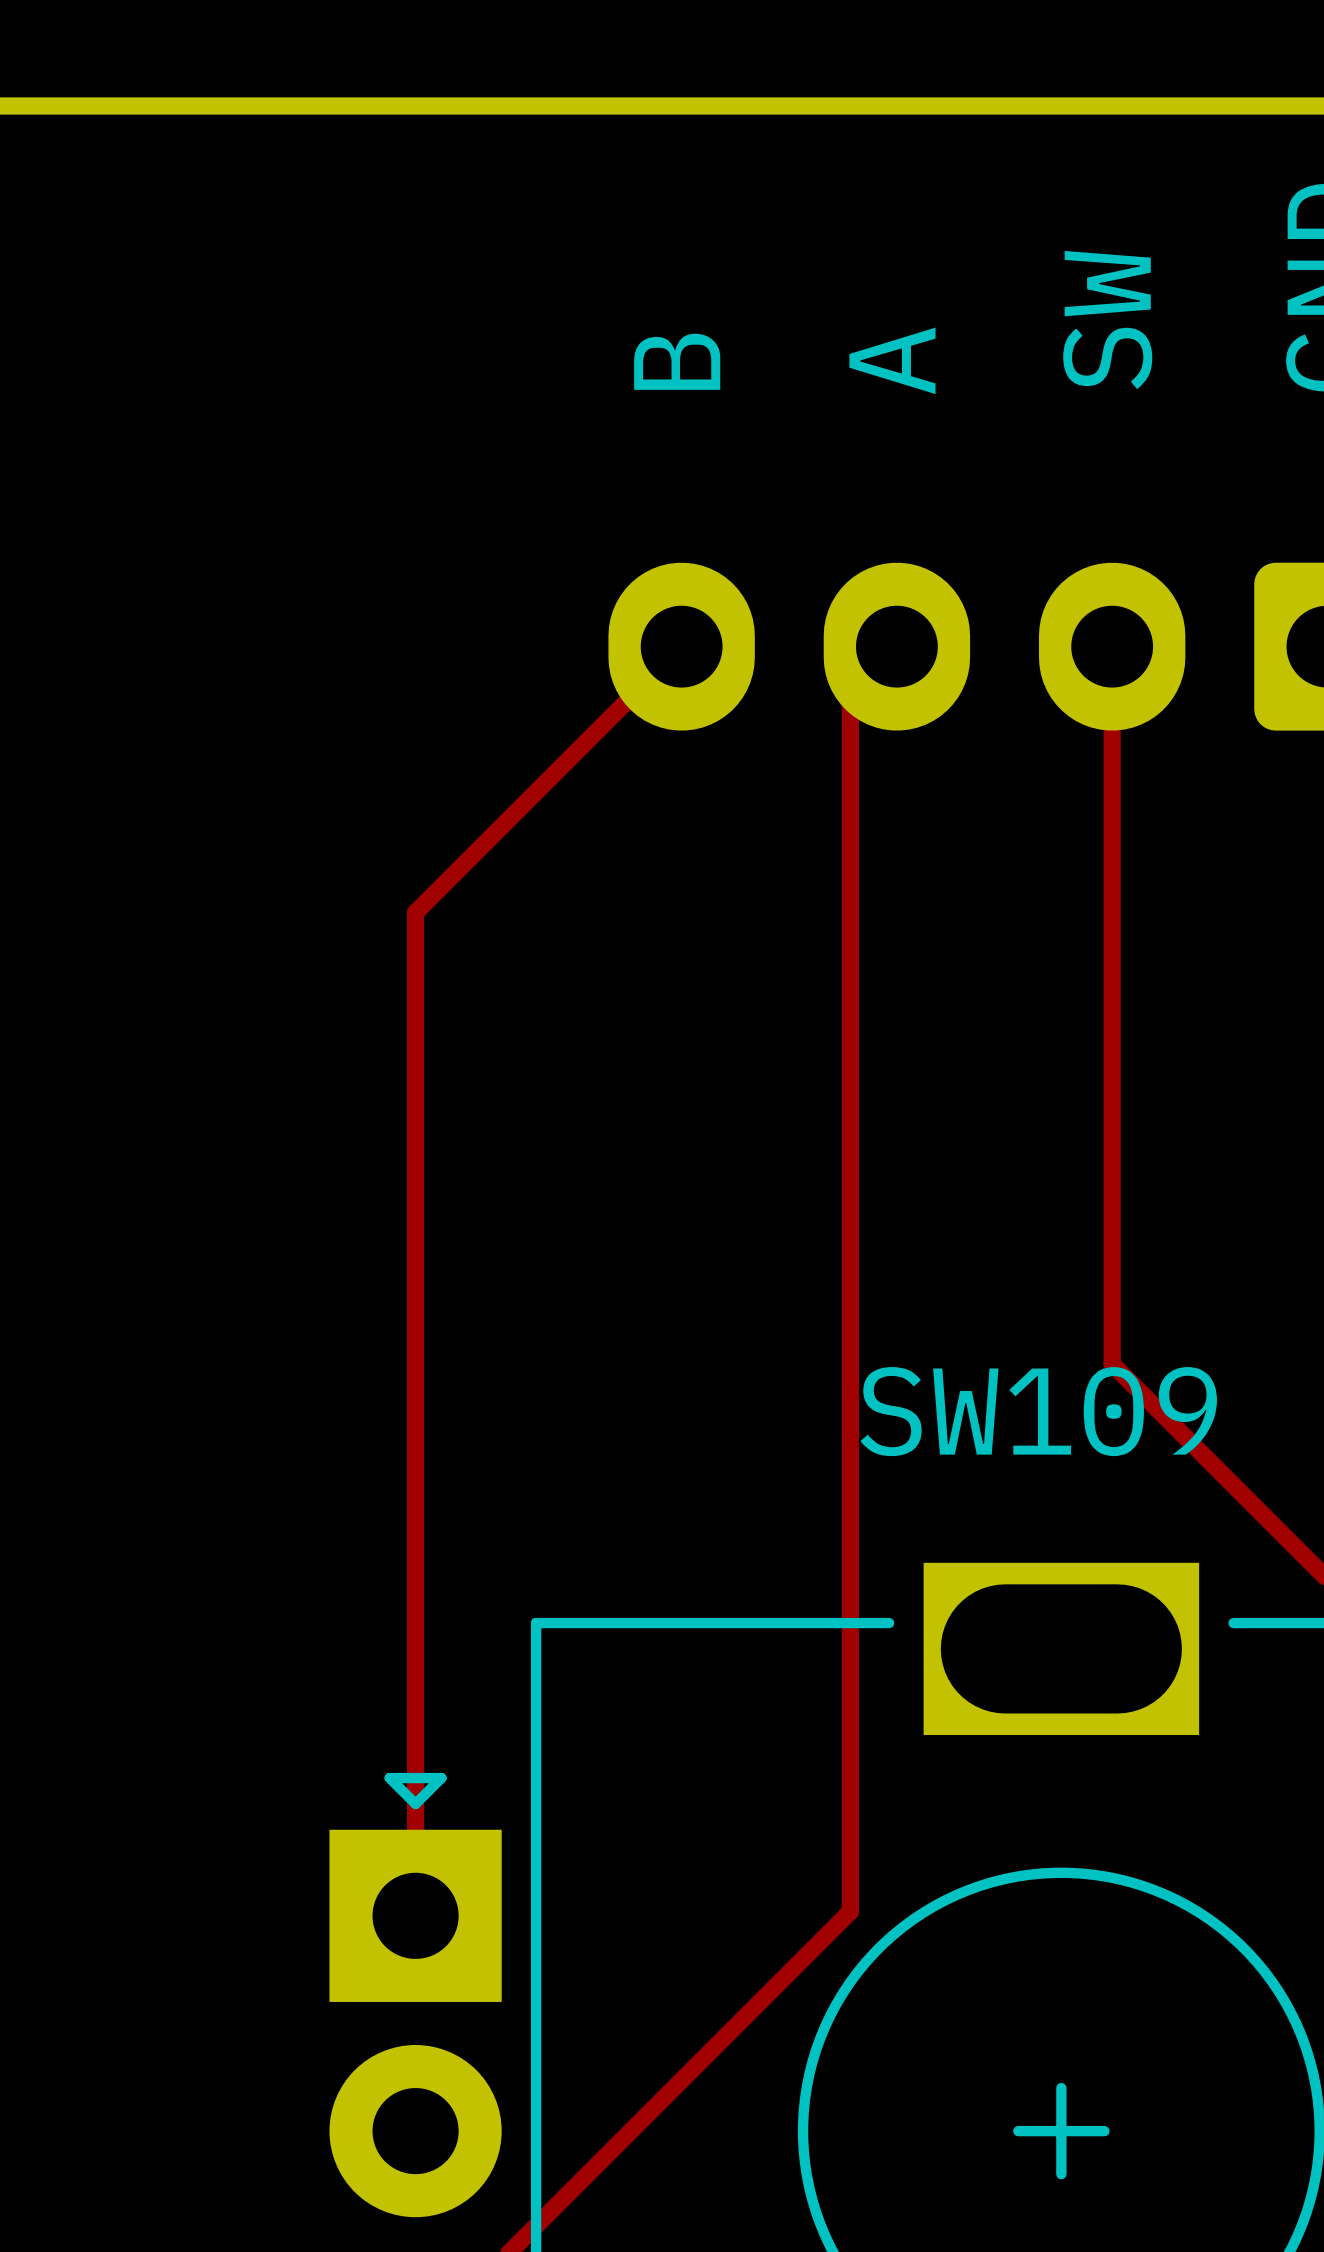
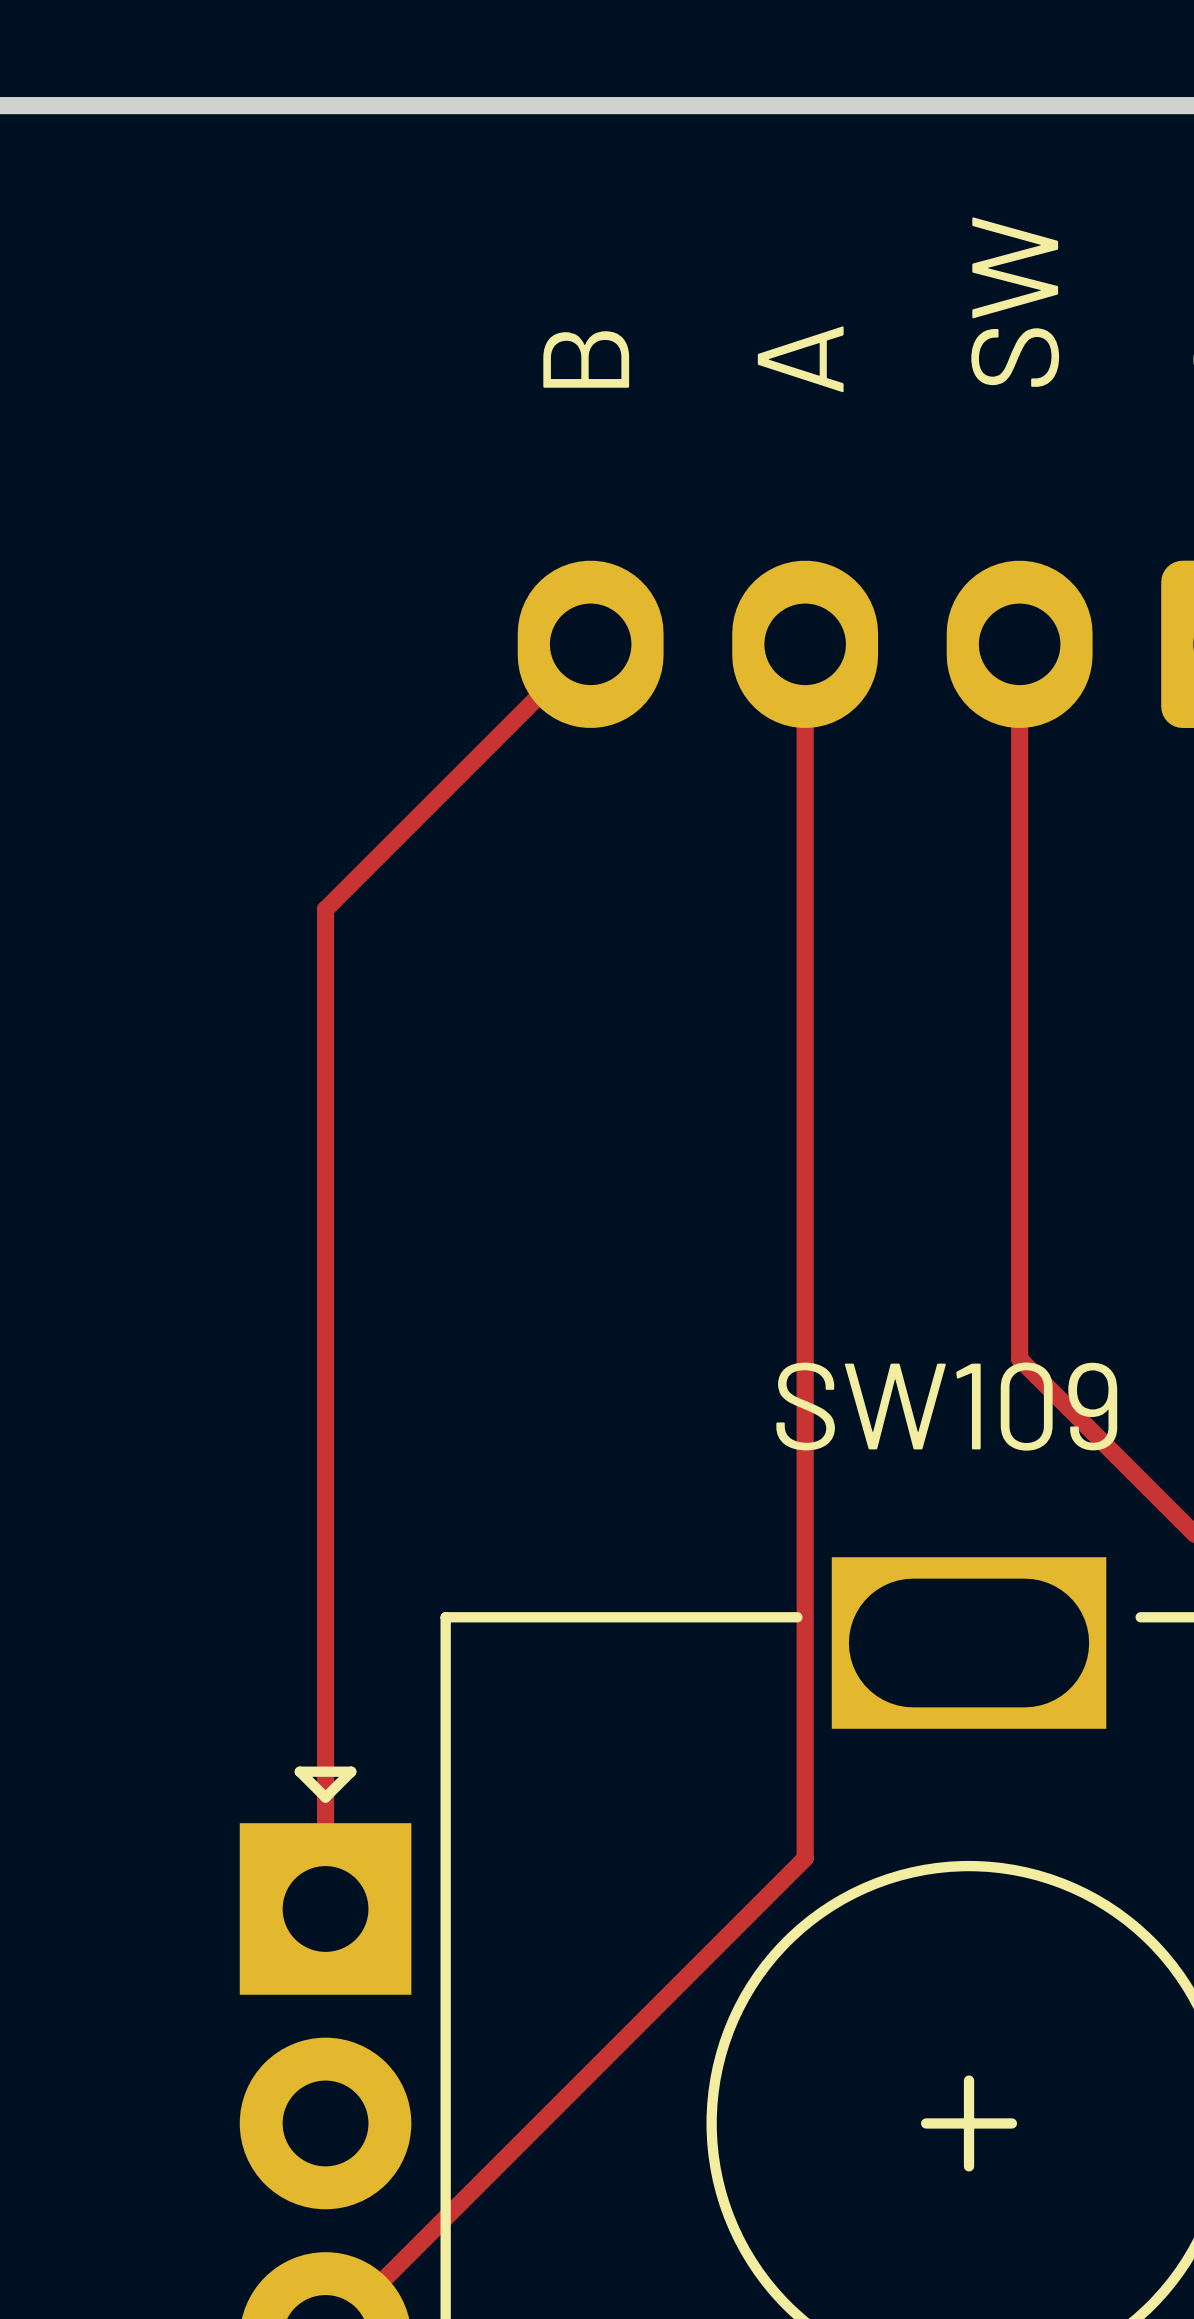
top track: (896, 646) (850, 693) (850, 1911) -> (805, 644) (805, 1858) (758, 1904)

